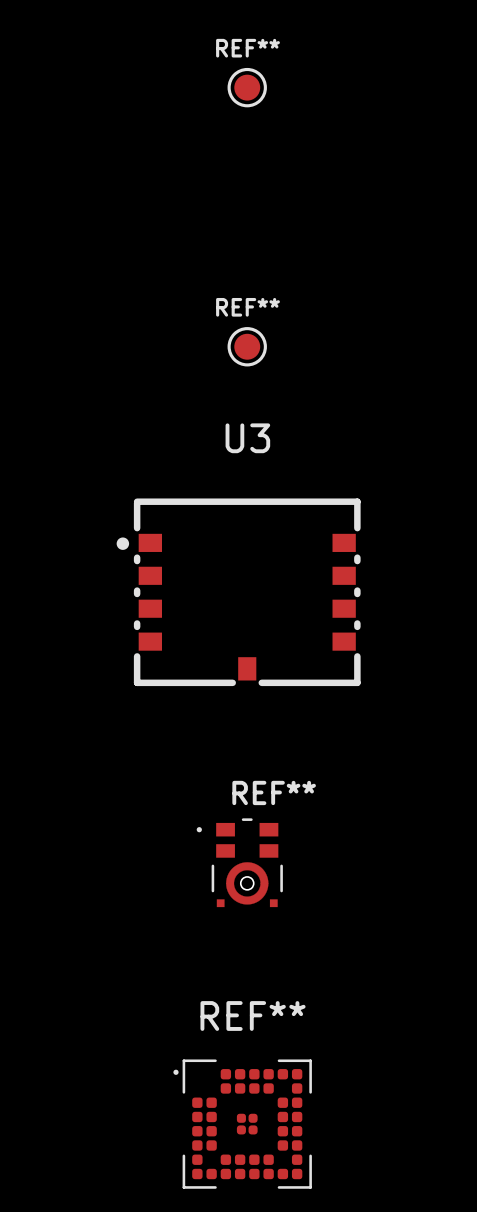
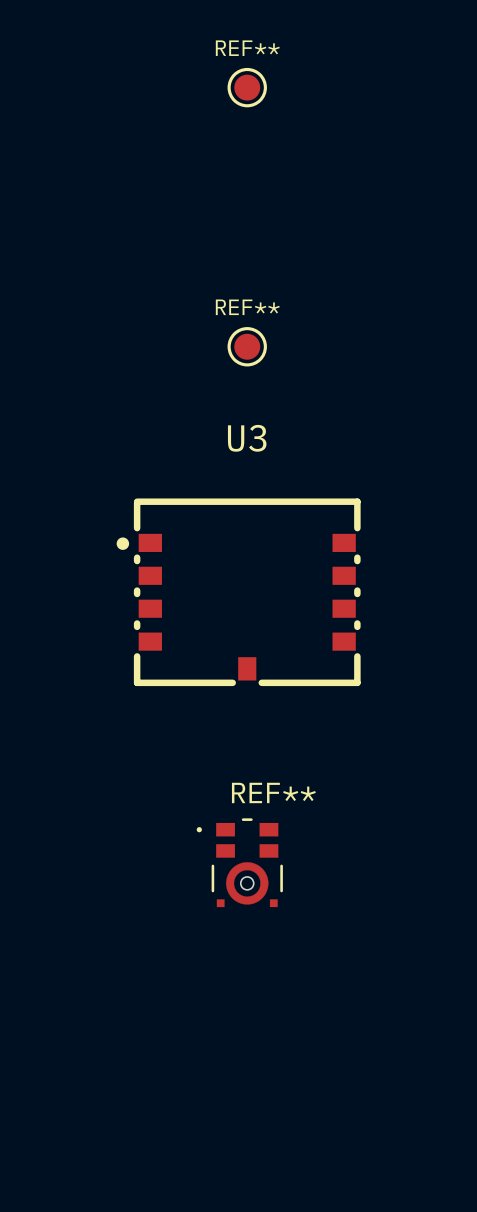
REF**: (242, 1124) -> none

